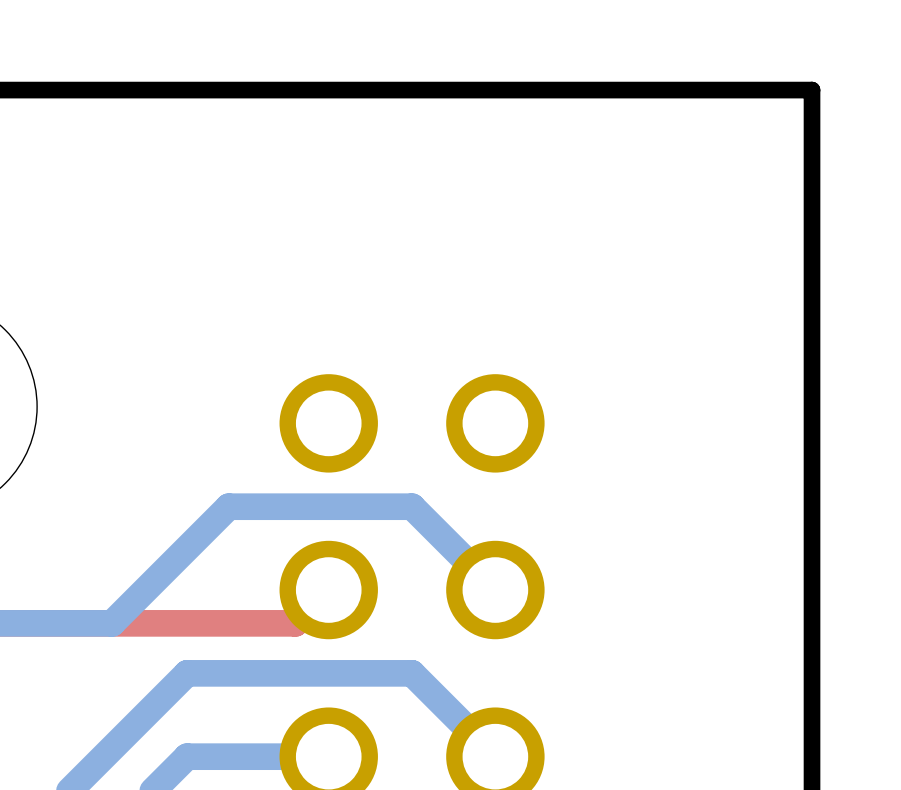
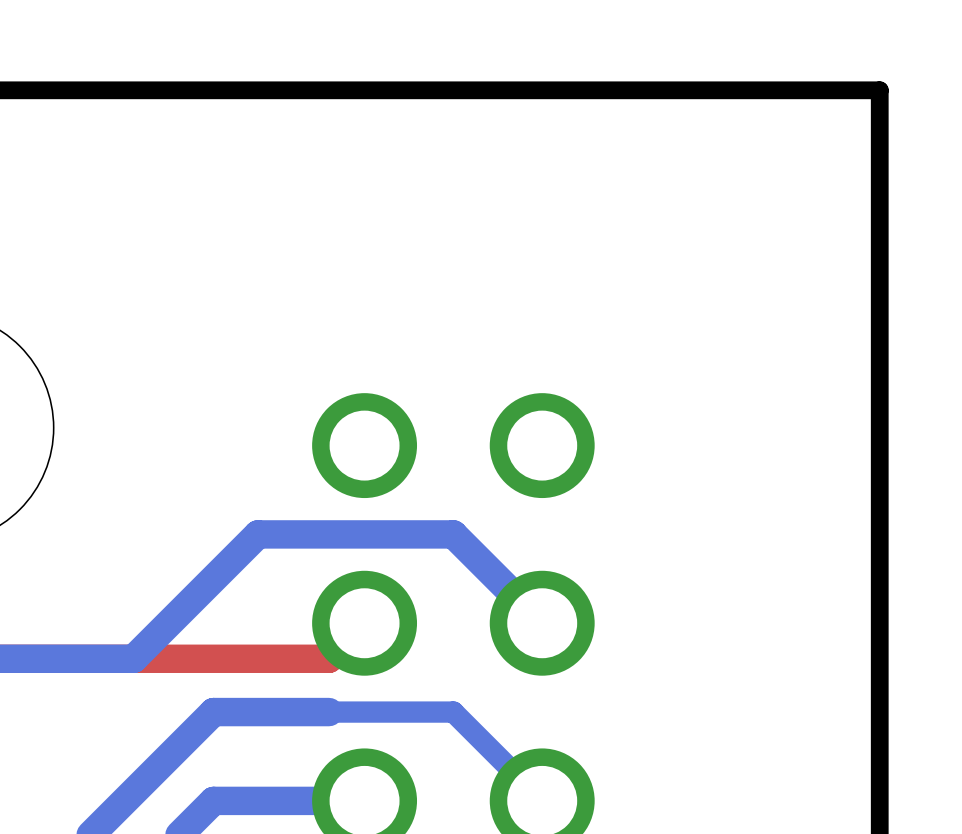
bottom track width: thick (295, 673) (412, 673) (495, 756) -> thin (329, 712) (453, 712) (542, 800)

